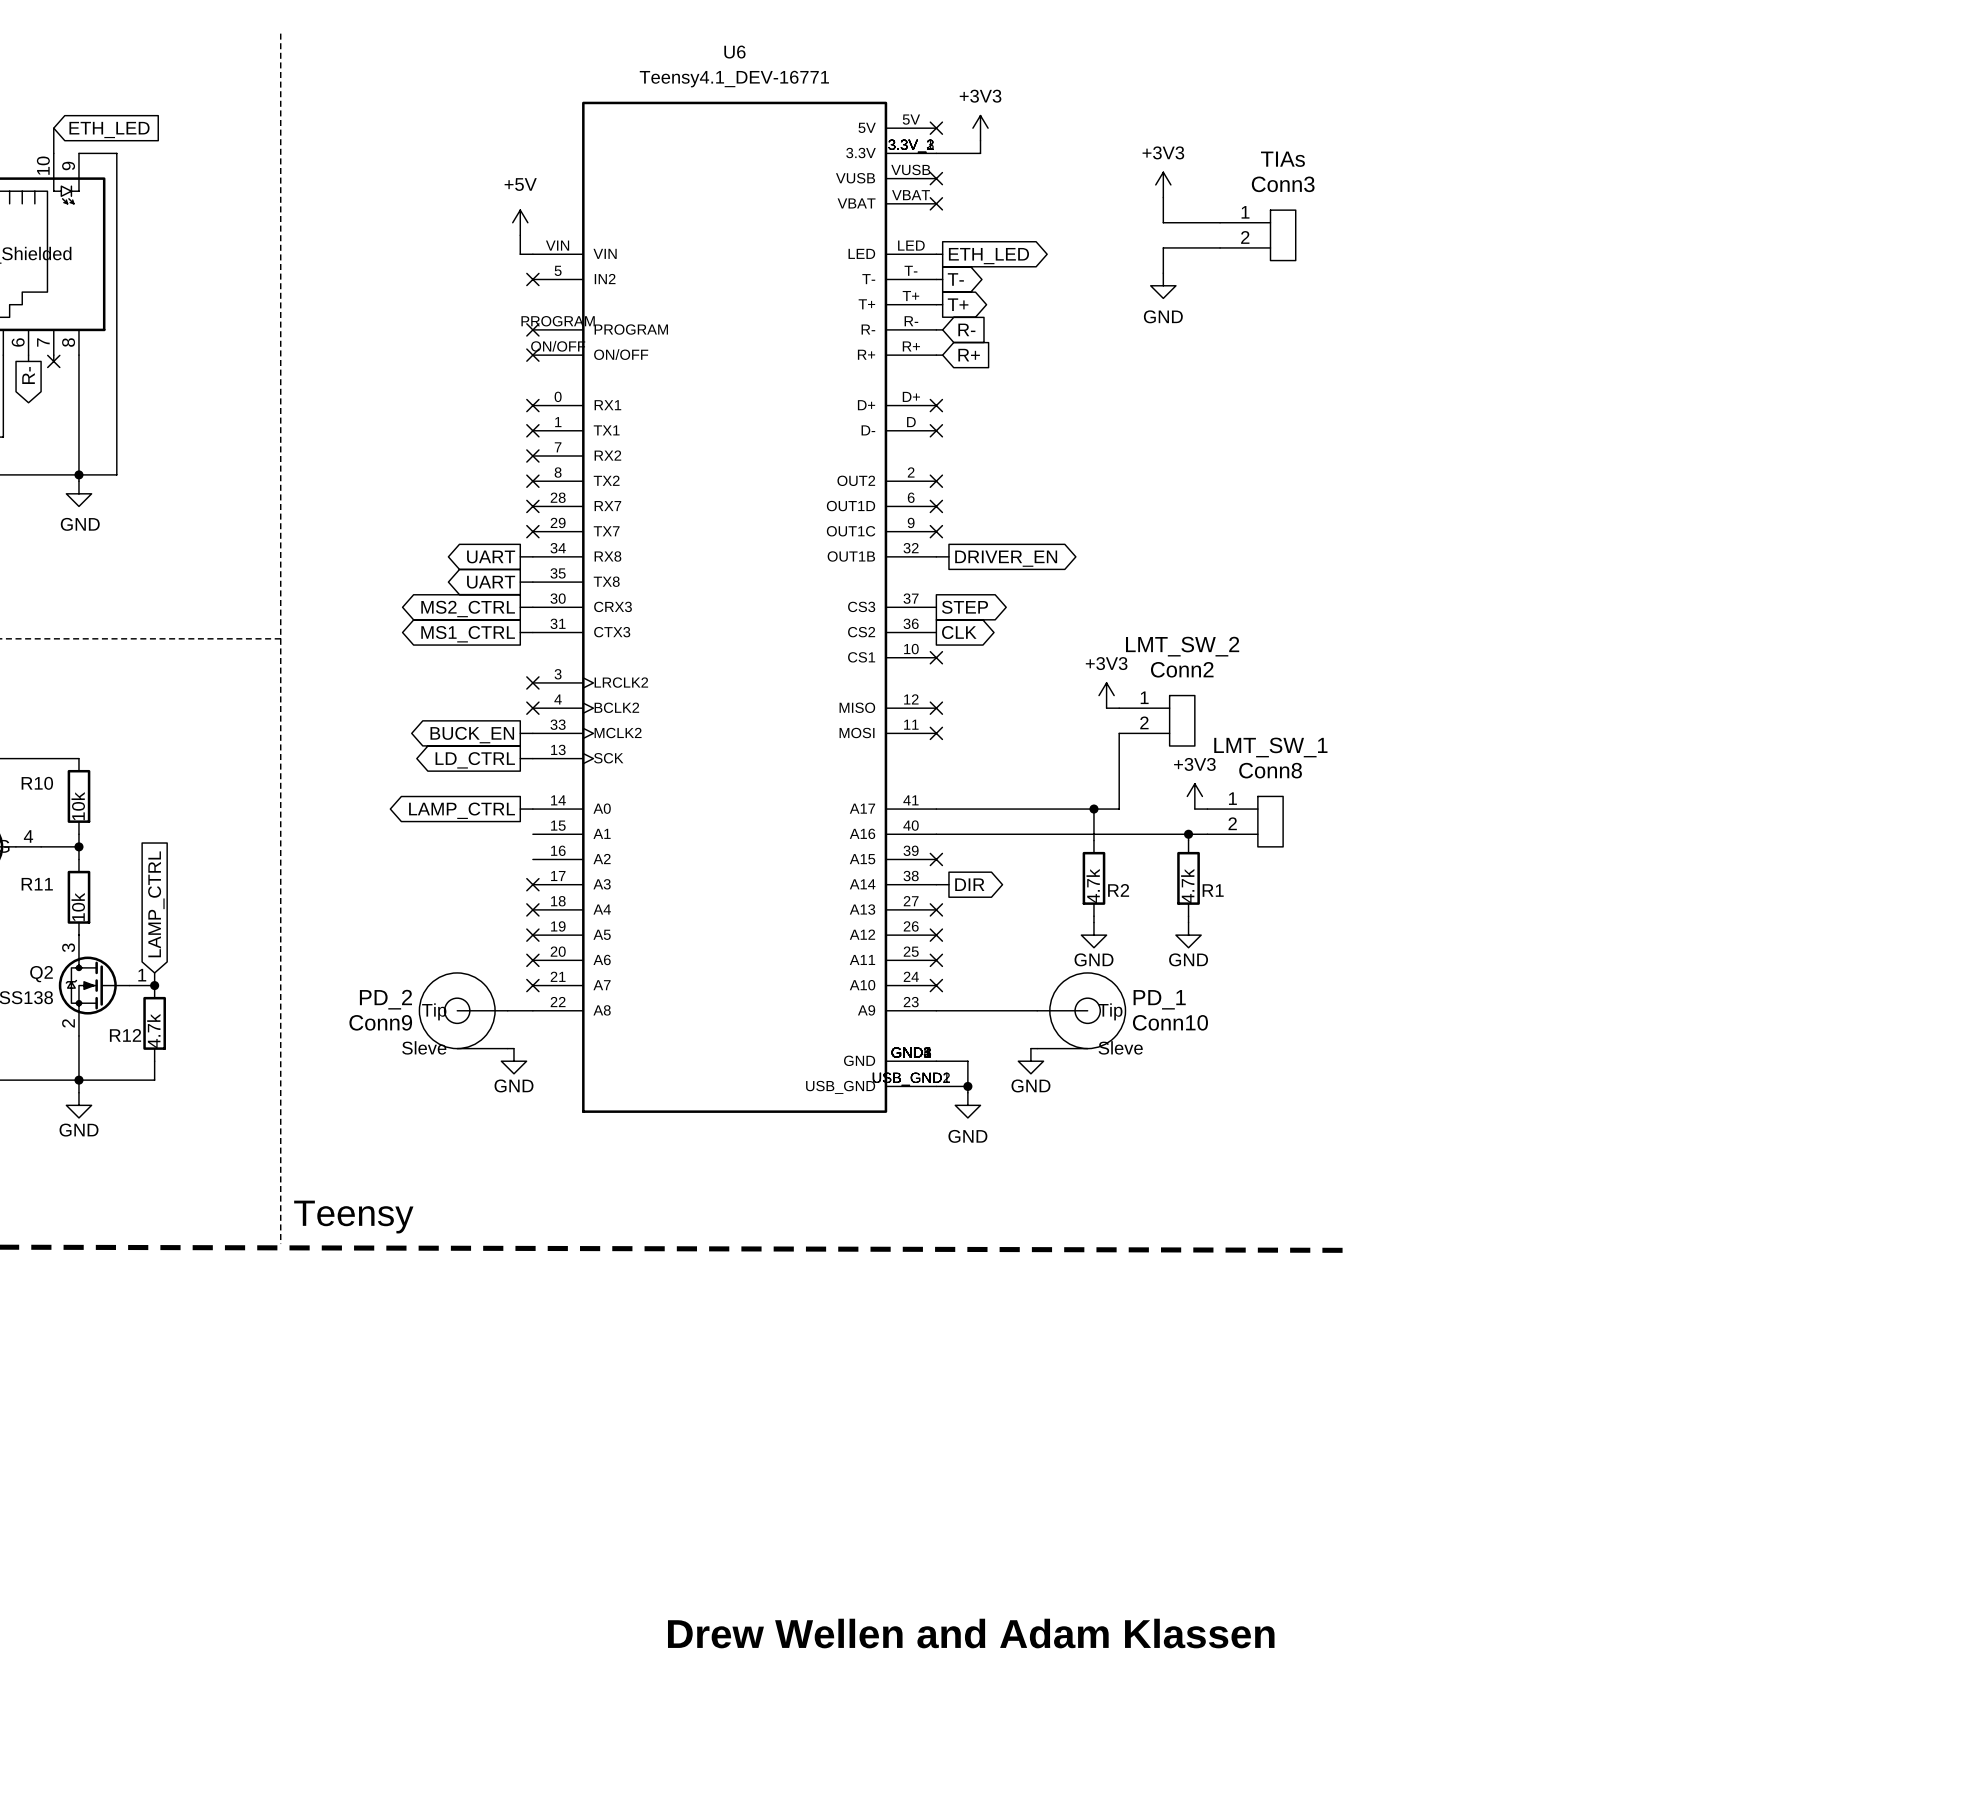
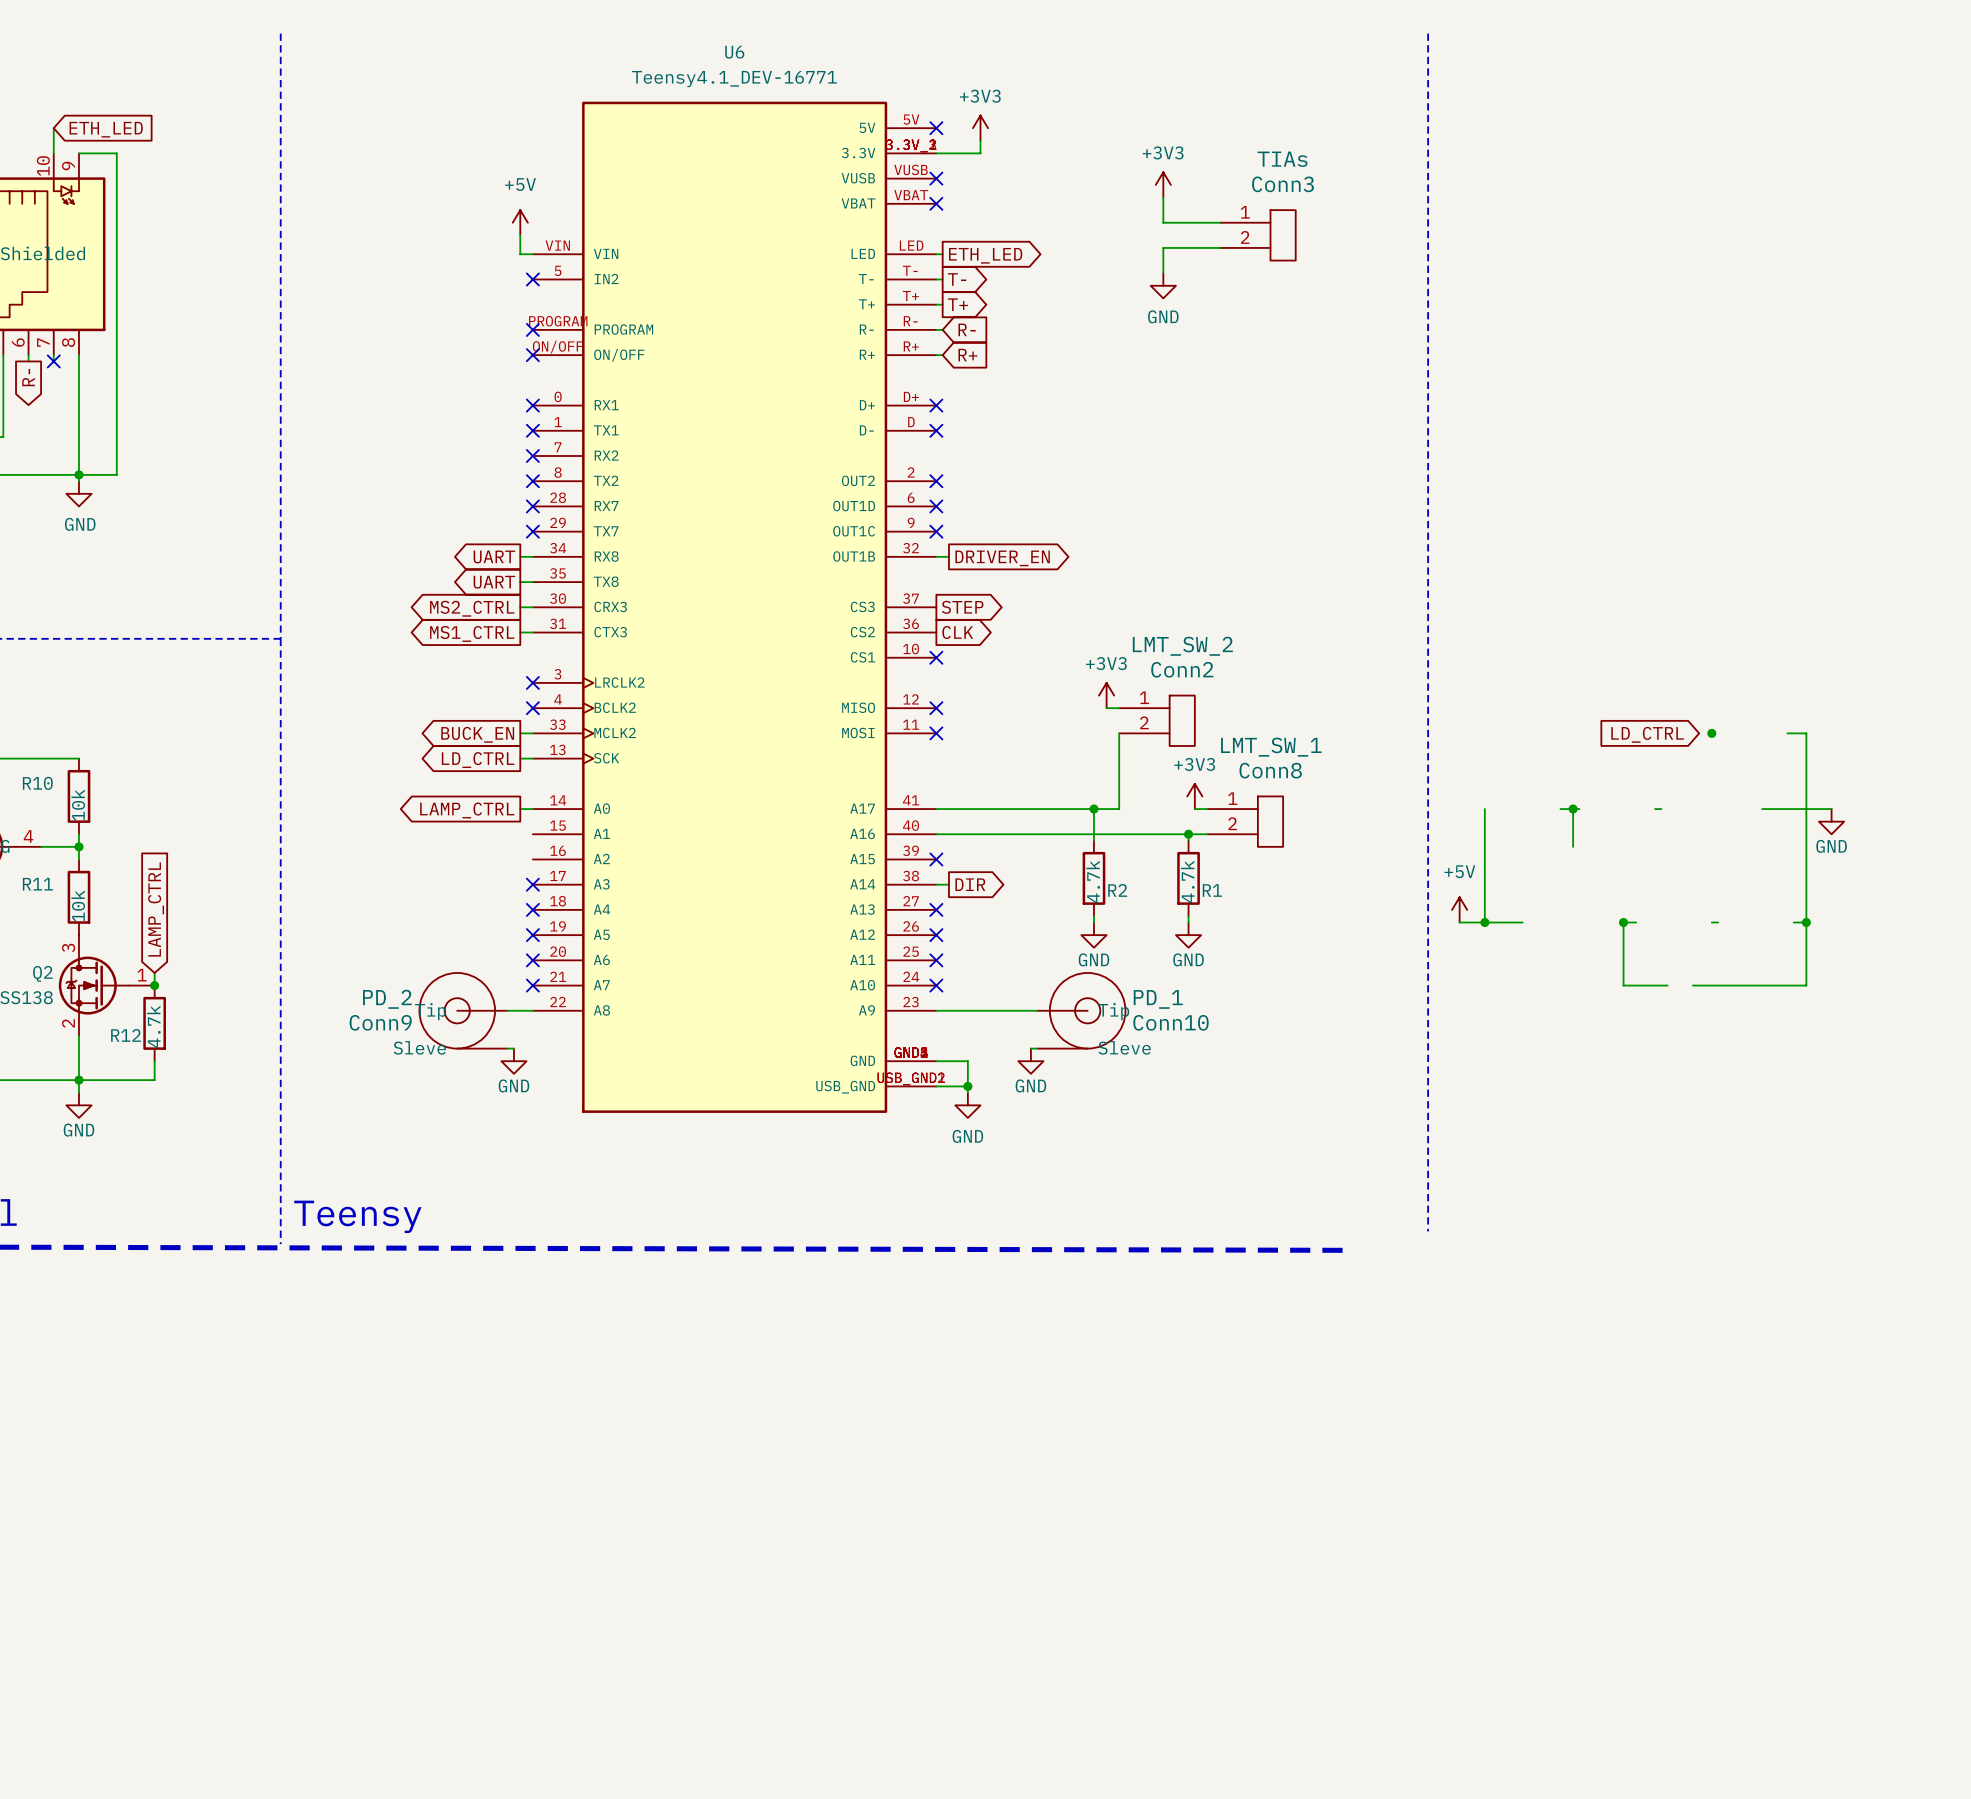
line: none -> (1428, 33) (1428, 1231)
junction: none -> (1711, 733)
wire: none -> (1787, 733) (1806, 733) (1806, 985) (1692, 985)
global label: none -> LD_CTRL (1647, 734)
wire: none -> (1484, 809) (1484, 922)
wire: none -> (1560, 809) (1579, 809)
wire: none -> (1573, 809) (1573, 846)
junction: none -> (1573, 809)
wire: none -> (1655, 809) (1661, 809)
wire: none -> (1762, 809) (1831, 809)
power symbol: none -> GND (1831, 821)
power symbol: none -> +5V (1459, 909)
wire: none -> (1459, 922) (1522, 922)
junction: none -> (1484, 922)
junction: none -> (1623, 922)
wire: none -> (1636, 922) (1623, 922) (1623, 985) (1667, 985)
wire: none -> (1711, 922) (1718, 922)
wire: none -> (1793, 922) (1806, 922)
junction: none -> (1806, 922)
text: Drew Wellen and Adam Klassen (971, 1633) -> none

